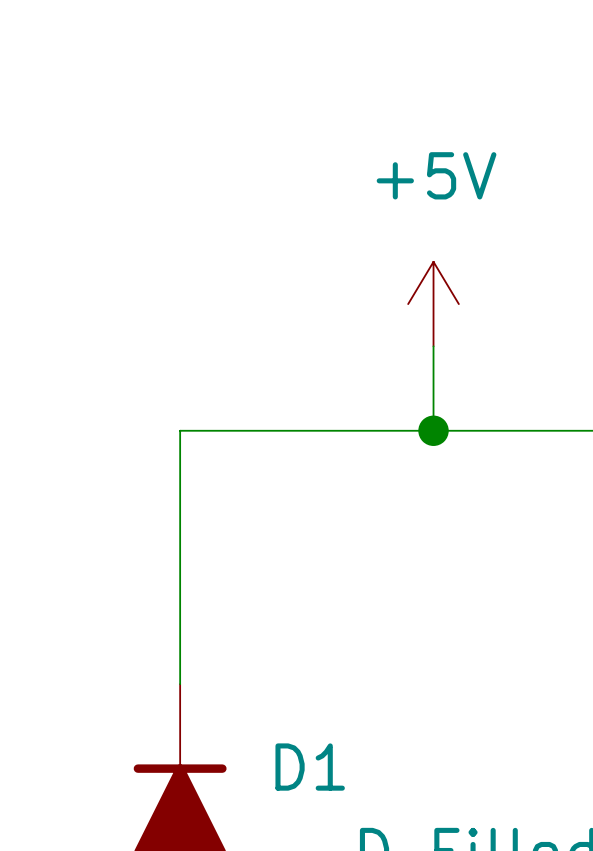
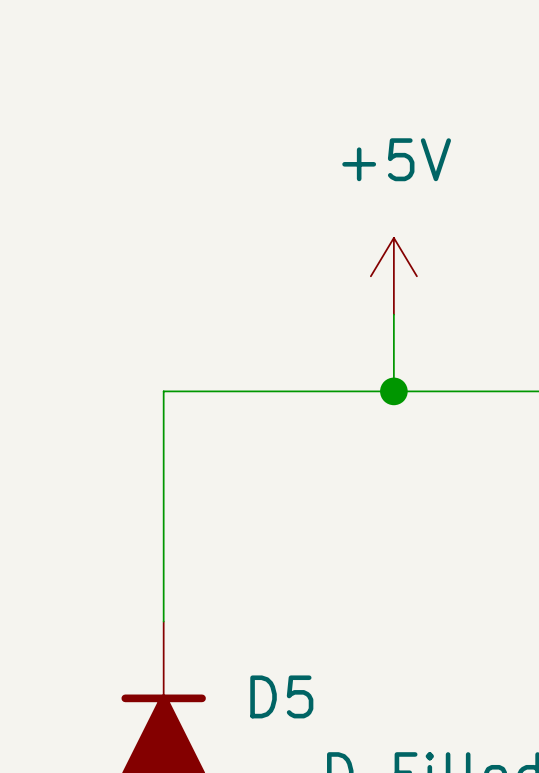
D1 name: D1 (310, 767) -> D5 (281, 696)

